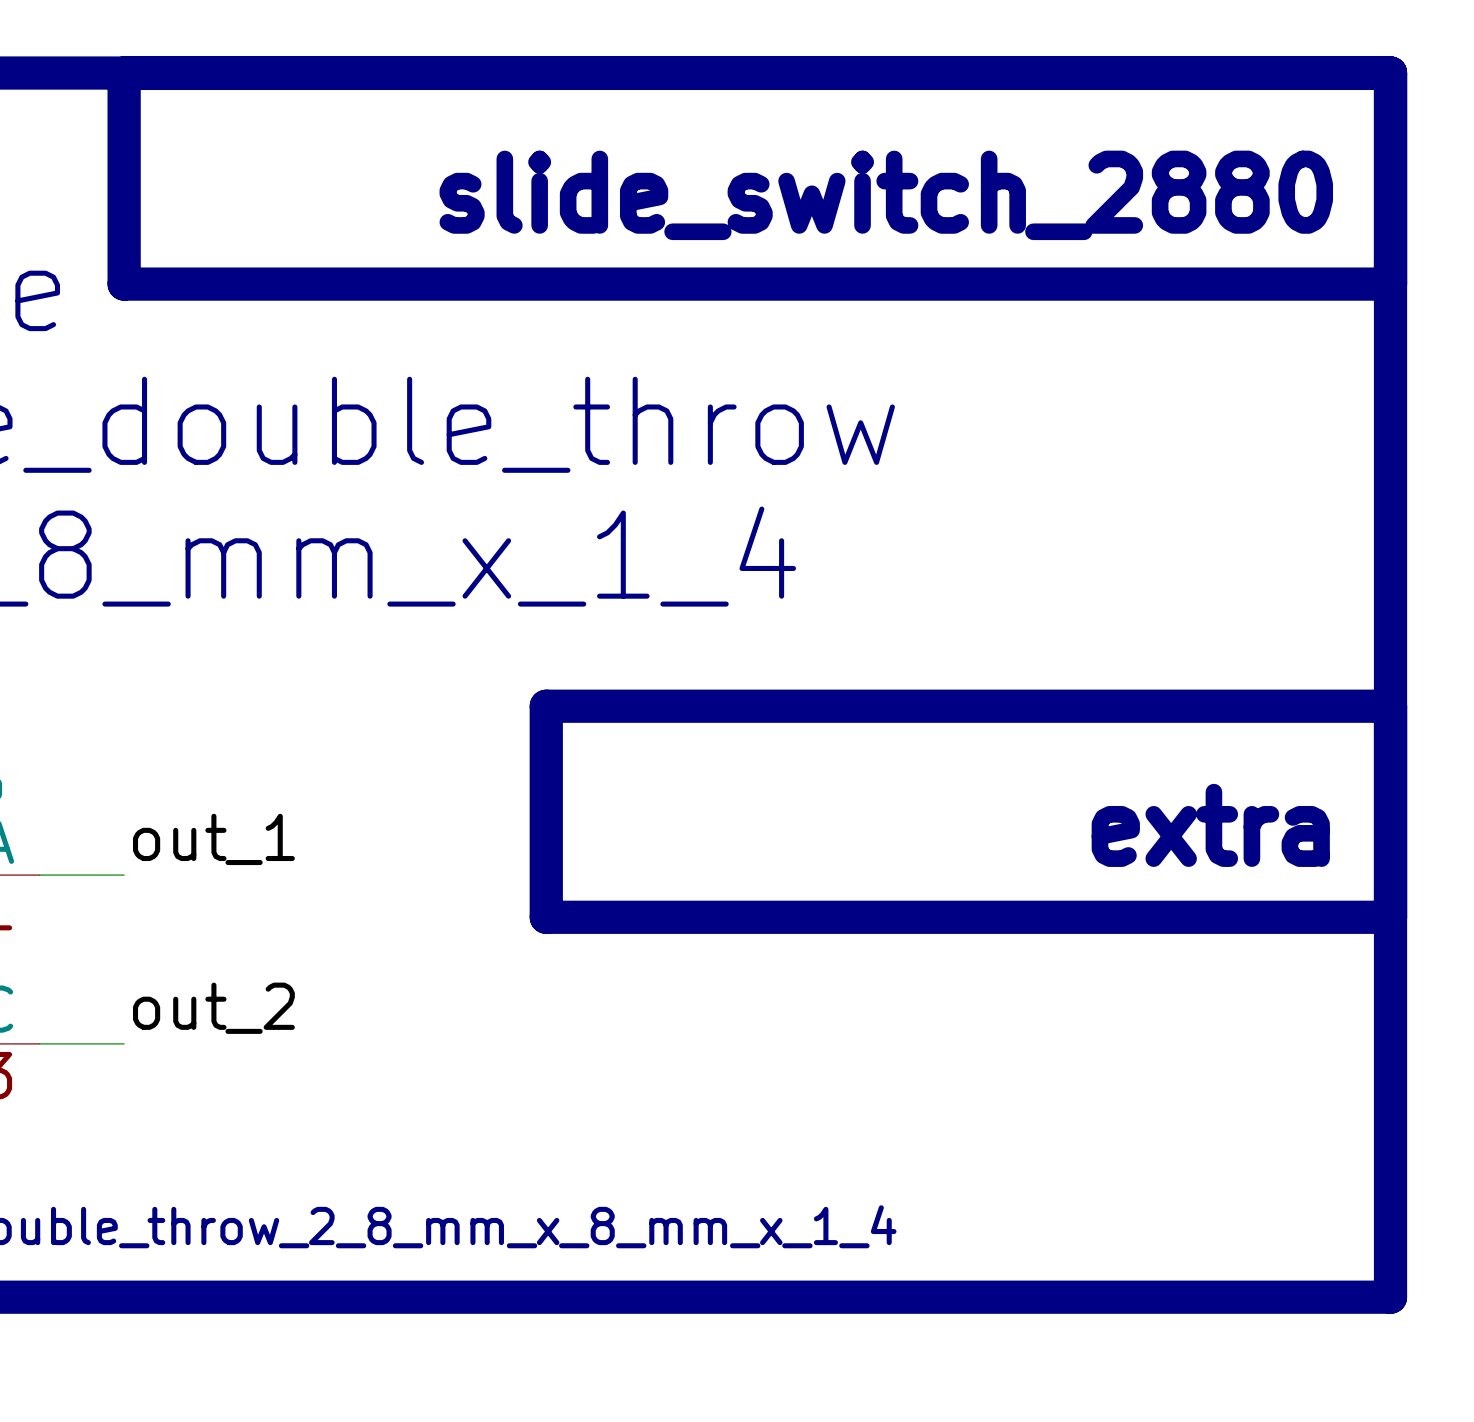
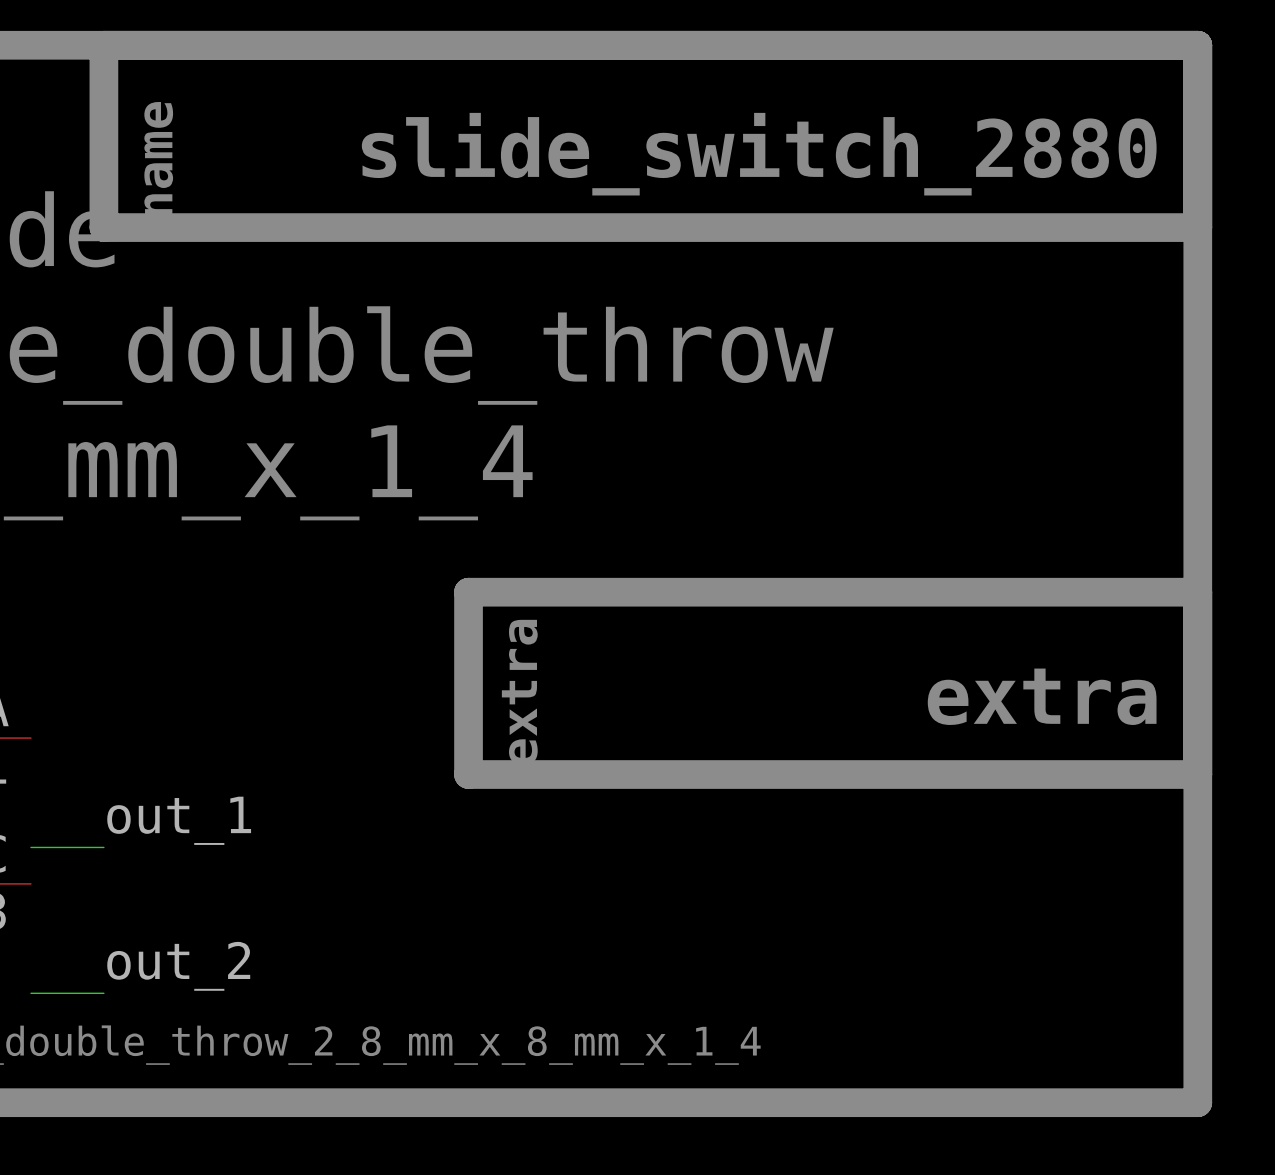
text: none -> name (158, 159)
text: none -> extra (519, 692)
label position: out_1 (213, 839) -> out_1 (179, 820)
wire: (39, 875) (124, 875) -> (30, 847) (103, 847)
label position: out_2 (213, 1008) -> out_2 (178, 966)
wire: (39, 1043) (124, 1043) -> (30, 993) (103, 993)

